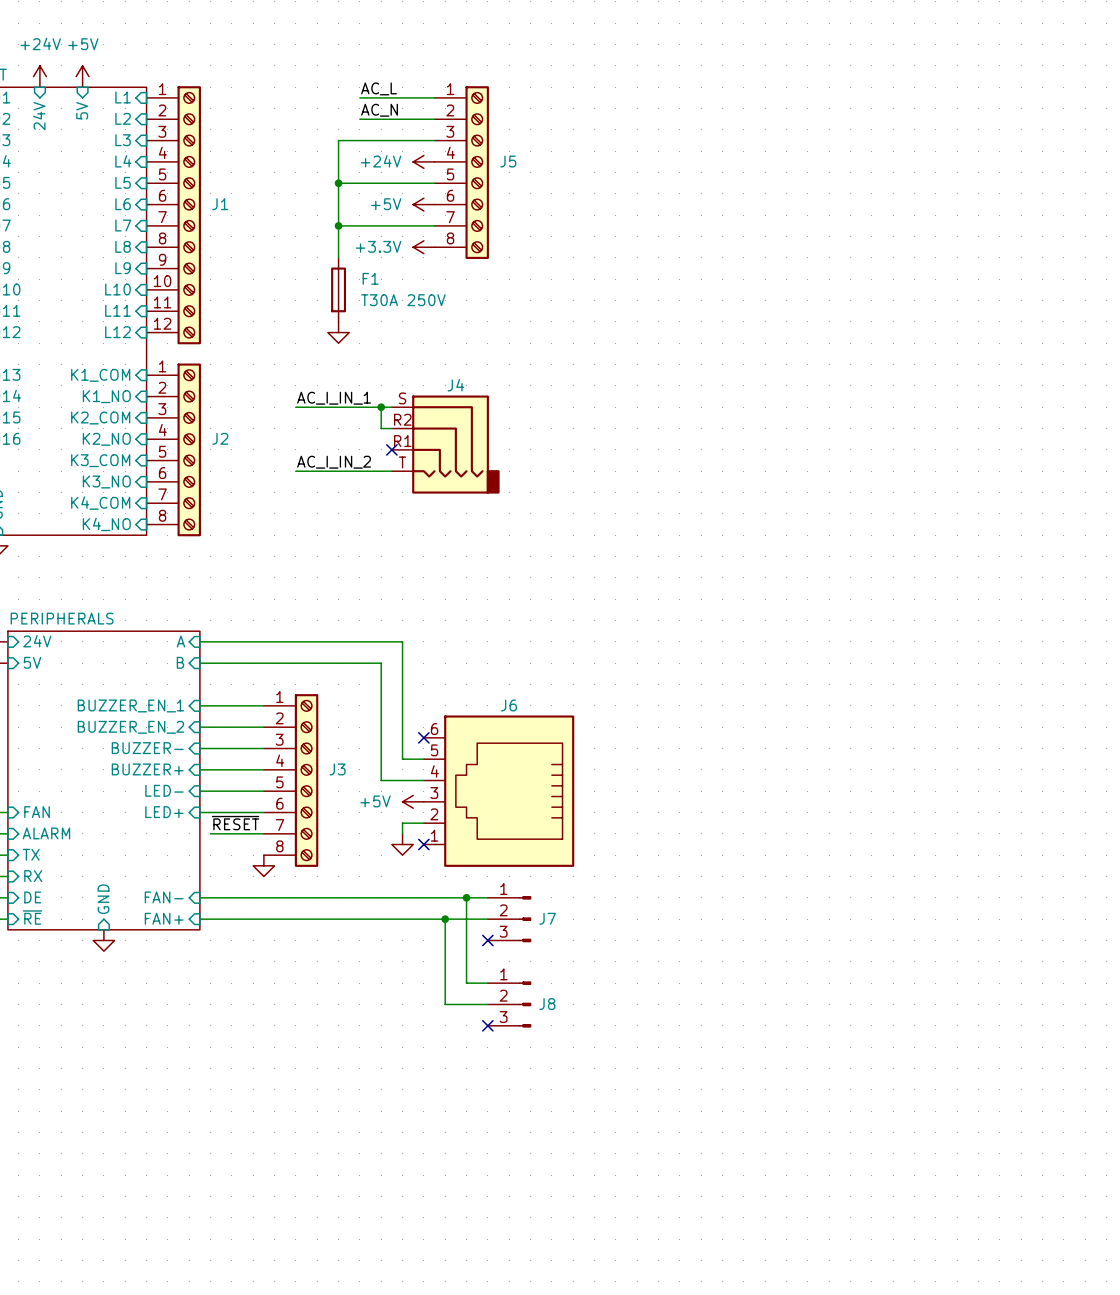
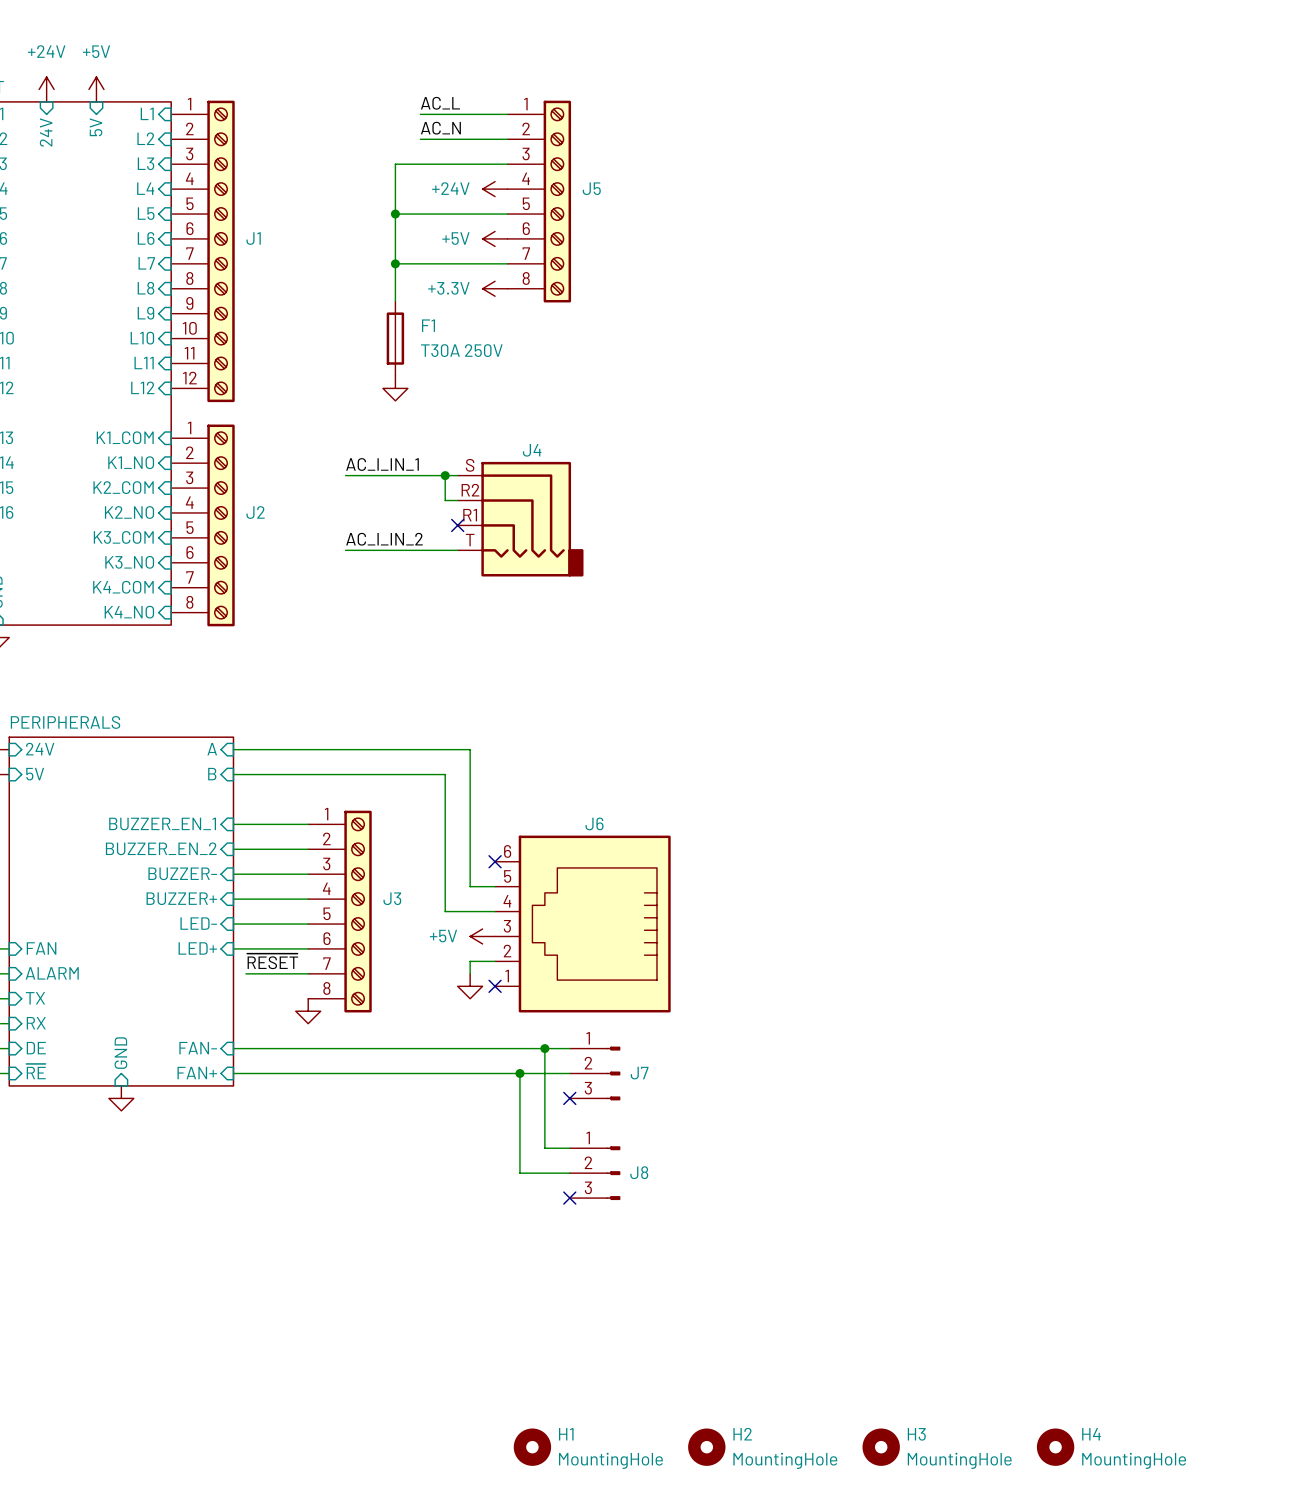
H1: none -> MountingHole (532, 1447)
H2: none -> MountingHole (706, 1447)
H3: none -> MountingHole (881, 1447)
H4: none -> MountingHole (1055, 1447)

